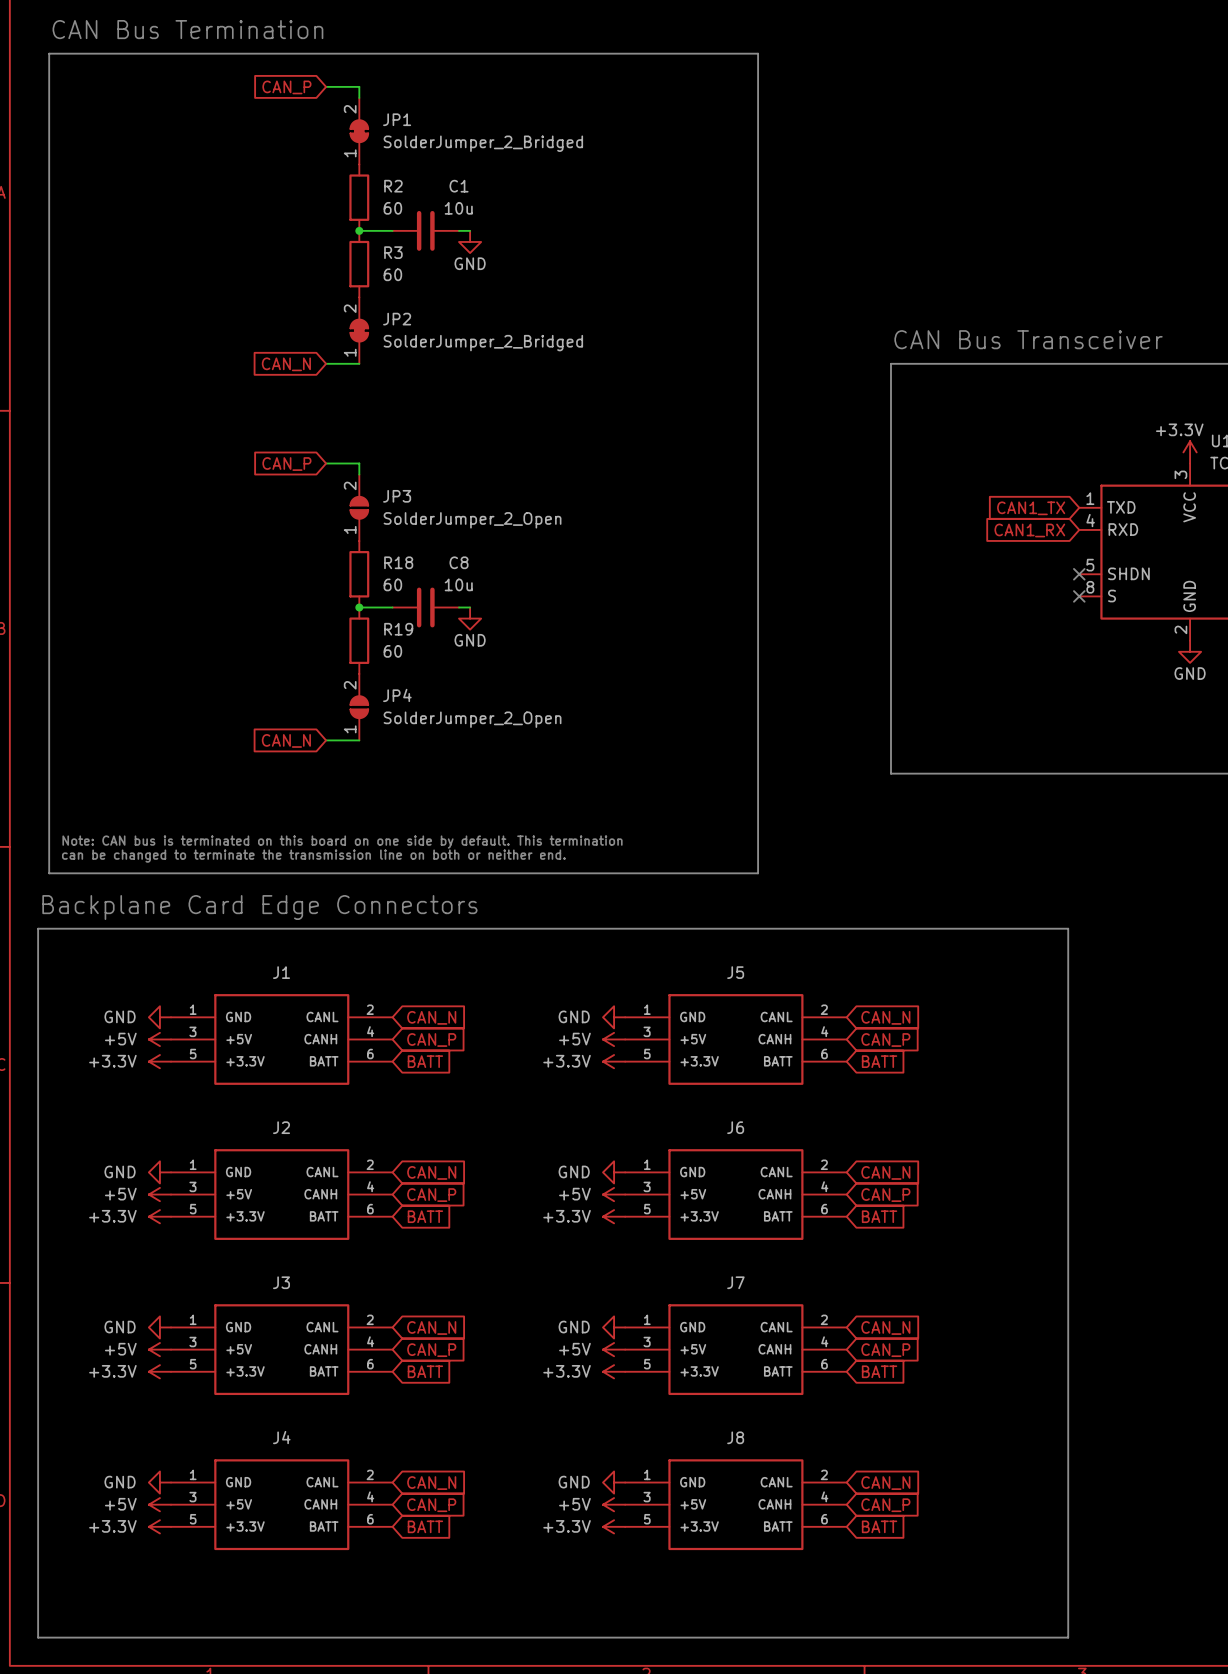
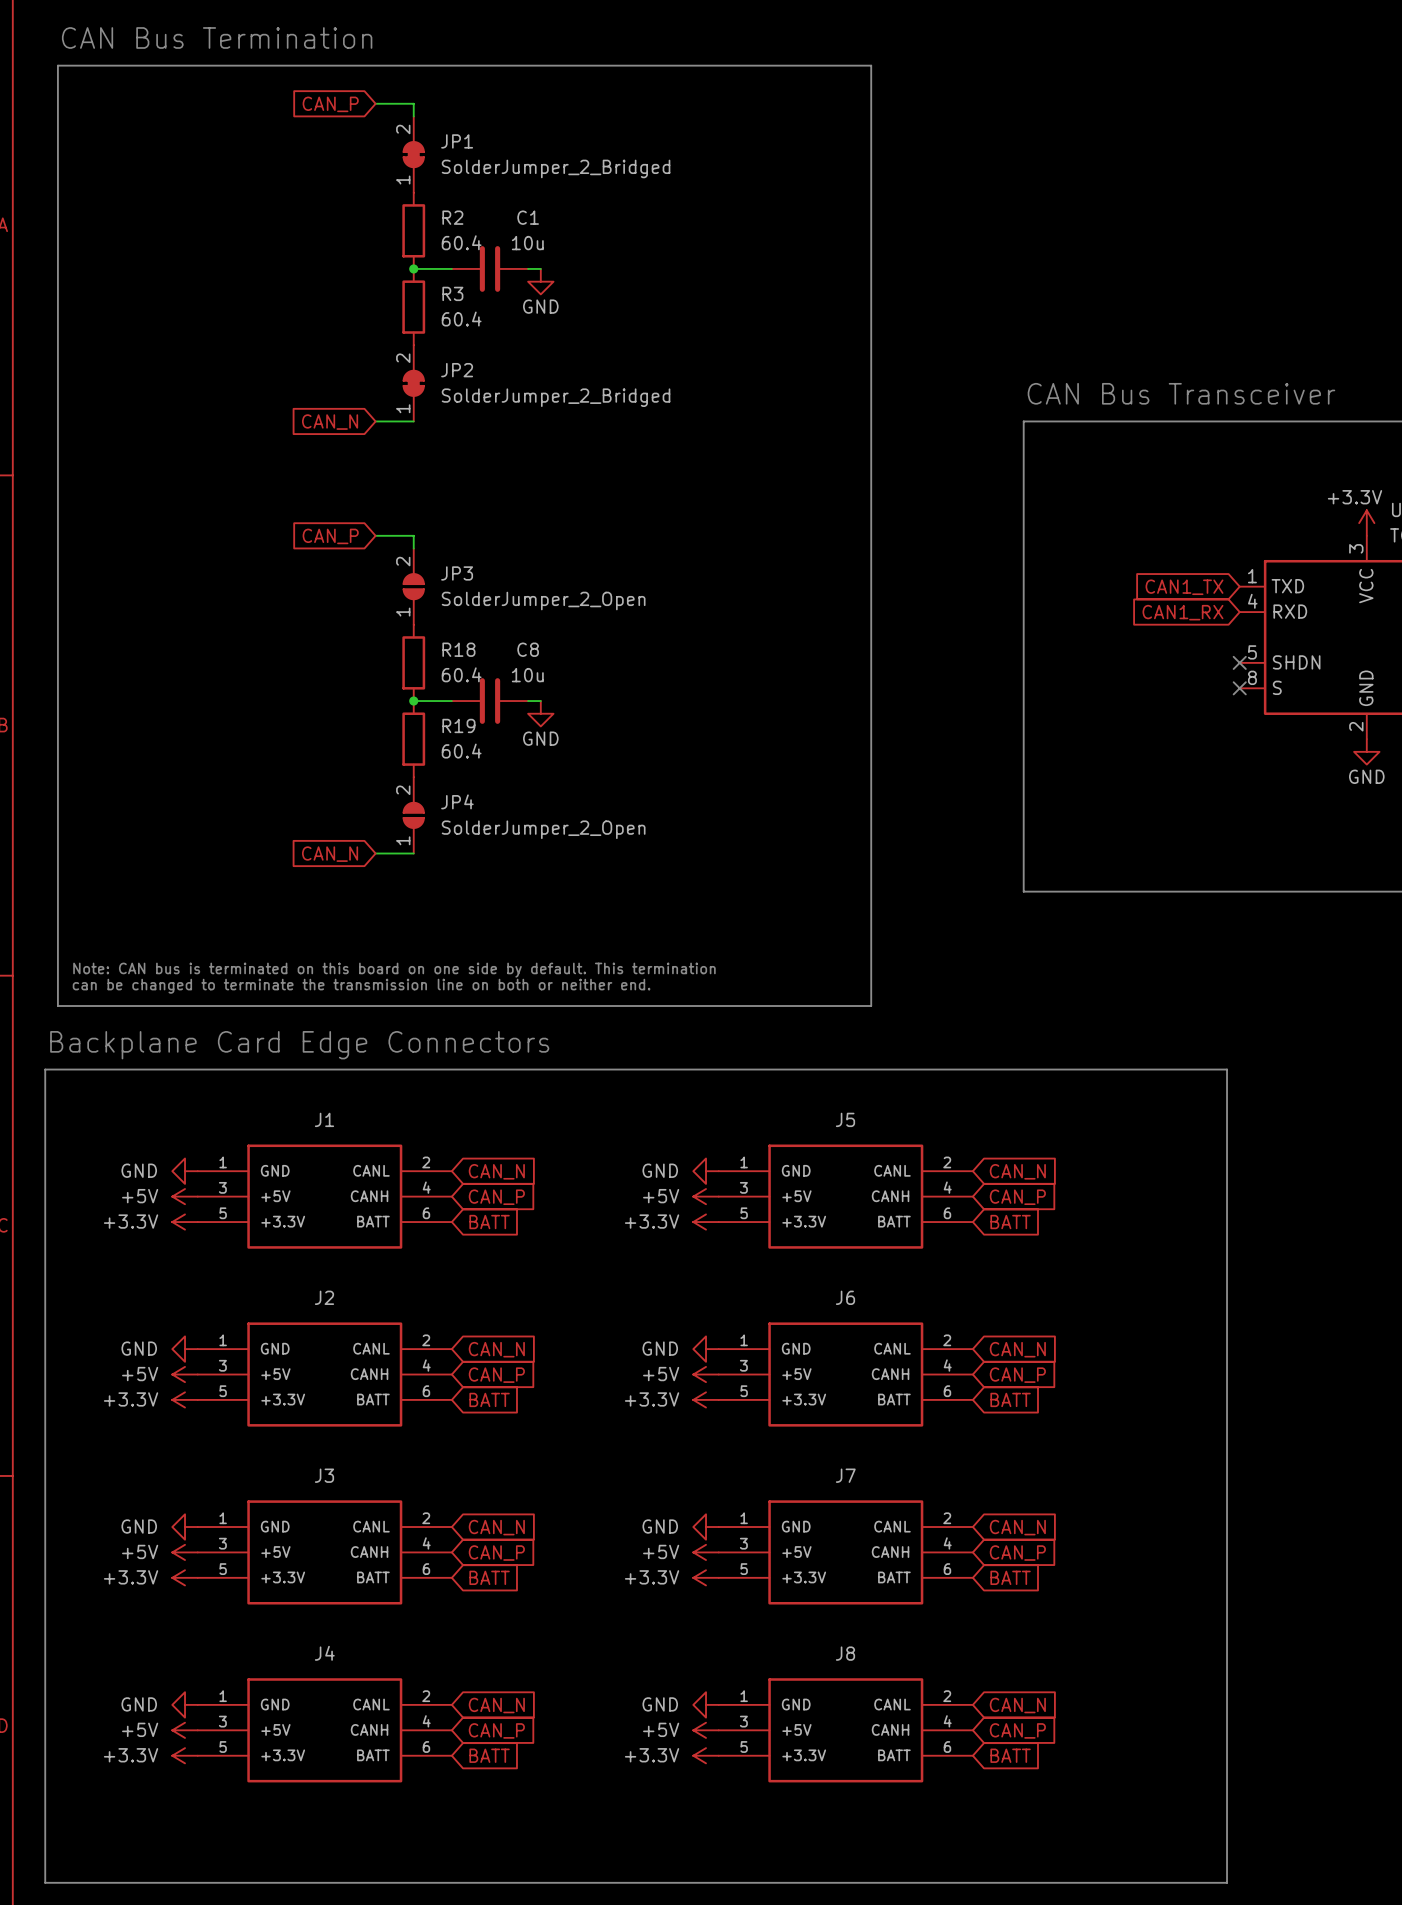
R2 value: 60 (392, 208) -> 60.4 (461, 242)
R3 value: 60 (392, 274) -> 60.4 (461, 319)
R18 value: 60 (392, 584) -> 60.4 (461, 674)
R19 value: 60 (392, 651) -> 60.4 (461, 751)

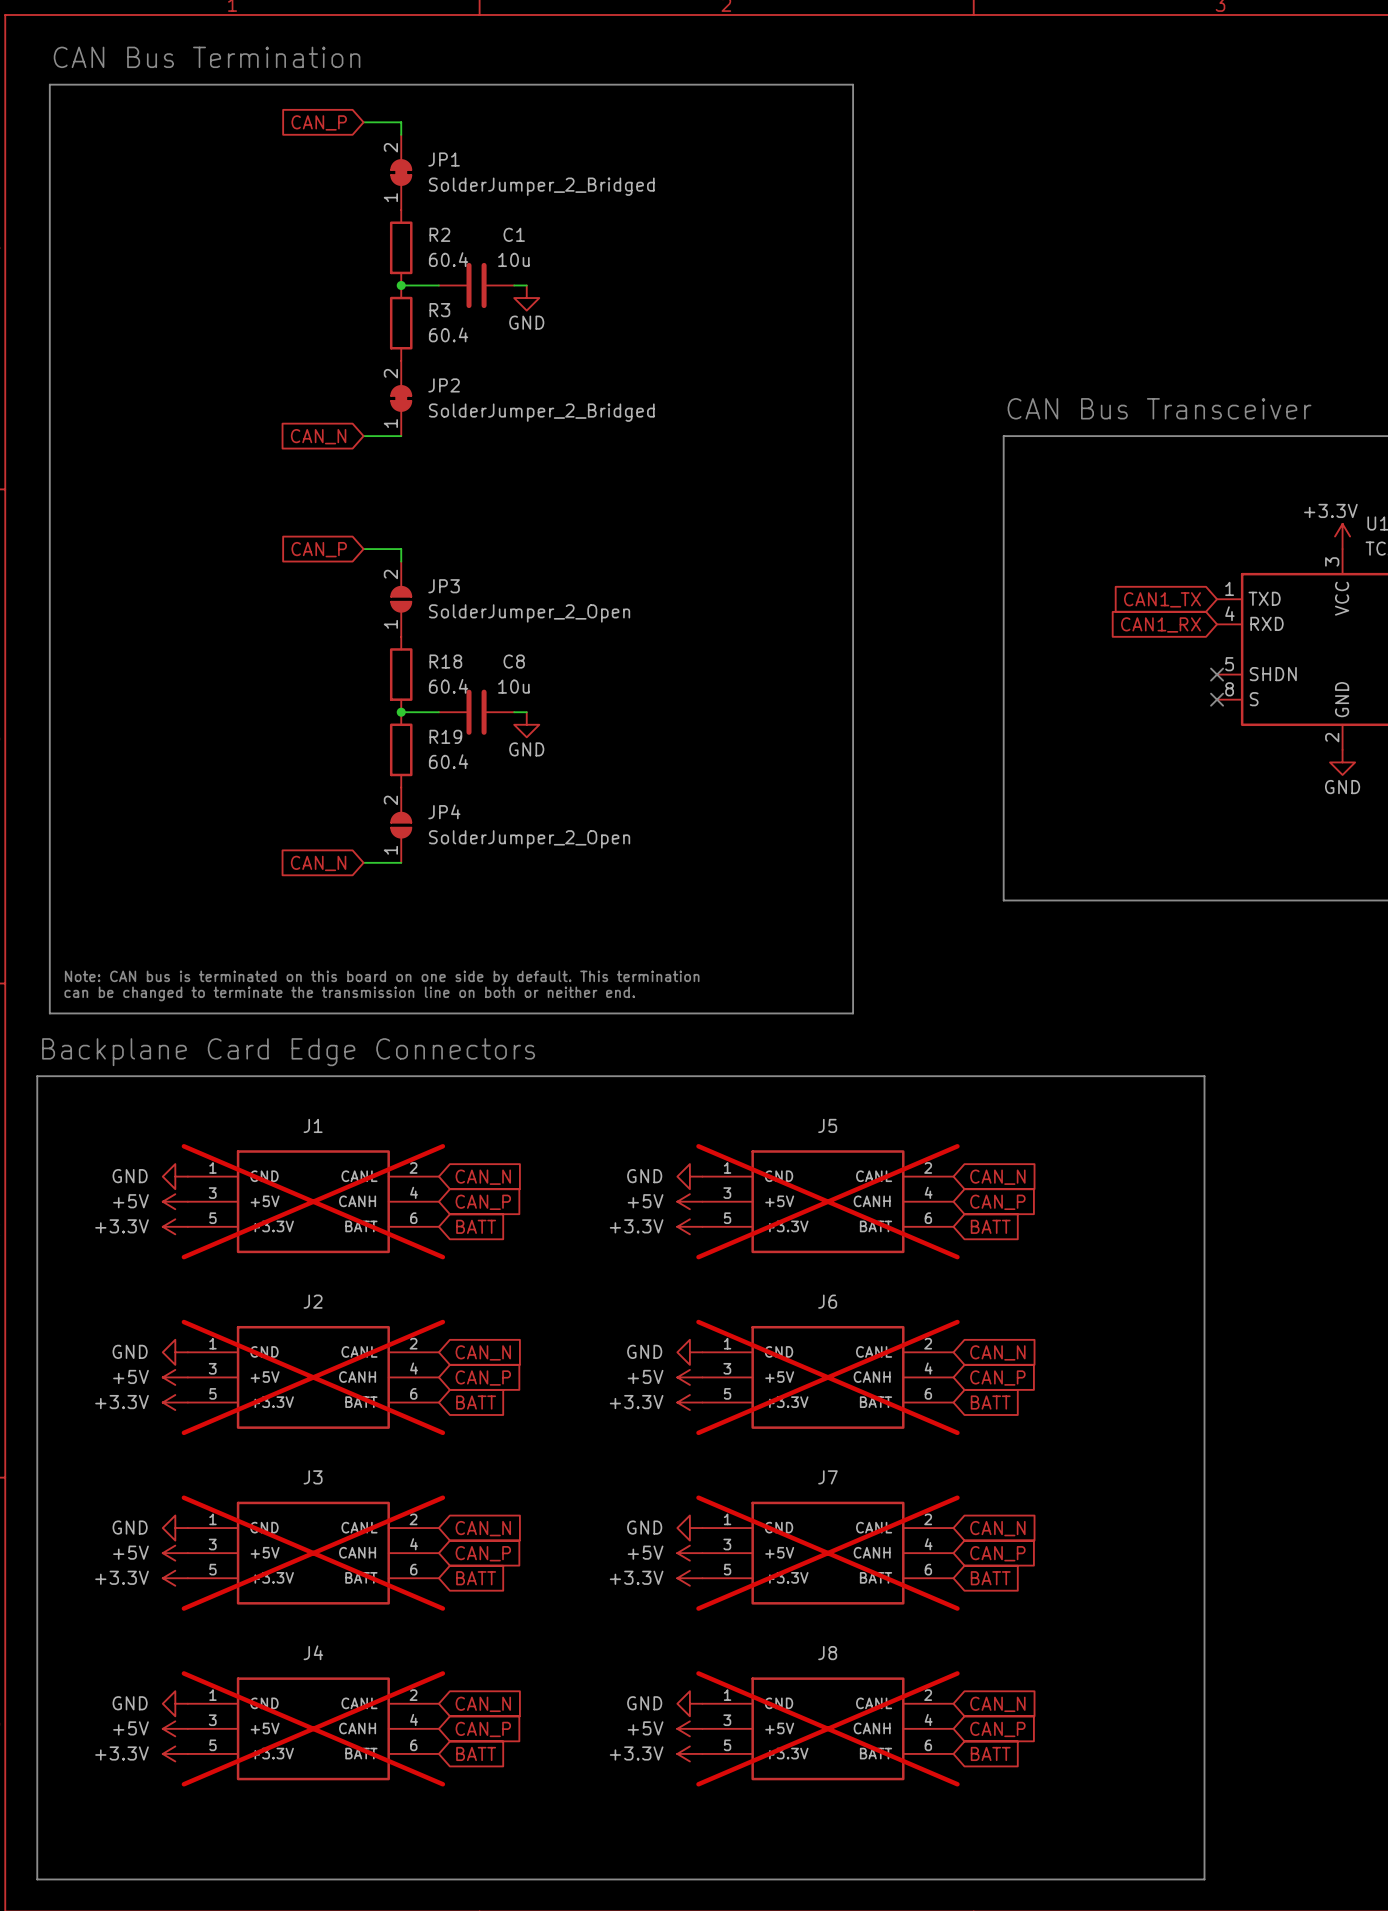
J1 do-not-place cross: none -> (313, 1201)
J5 do-not-place cross: none -> (827, 1201)
J2 do-not-place cross: none -> (313, 1377)
J6 do-not-place cross: none -> (827, 1377)
J3 do-not-place cross: none -> (313, 1553)
J7 do-not-place cross: none -> (827, 1553)
J4 do-not-place cross: none -> (313, 1728)
J8 do-not-place cross: none -> (827, 1728)

